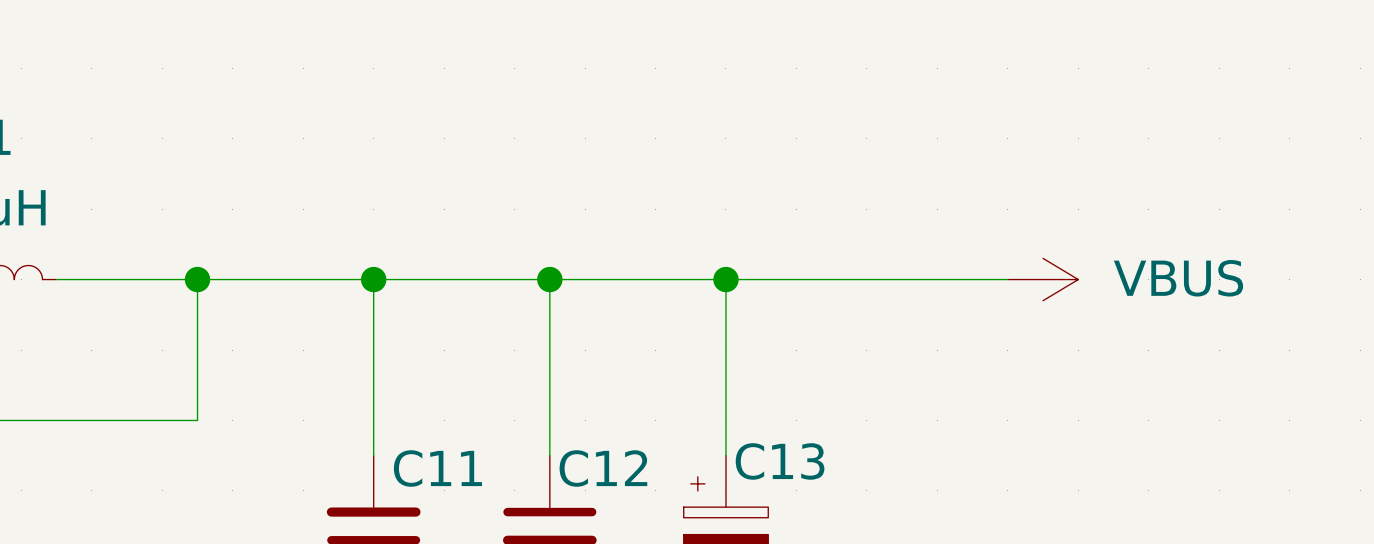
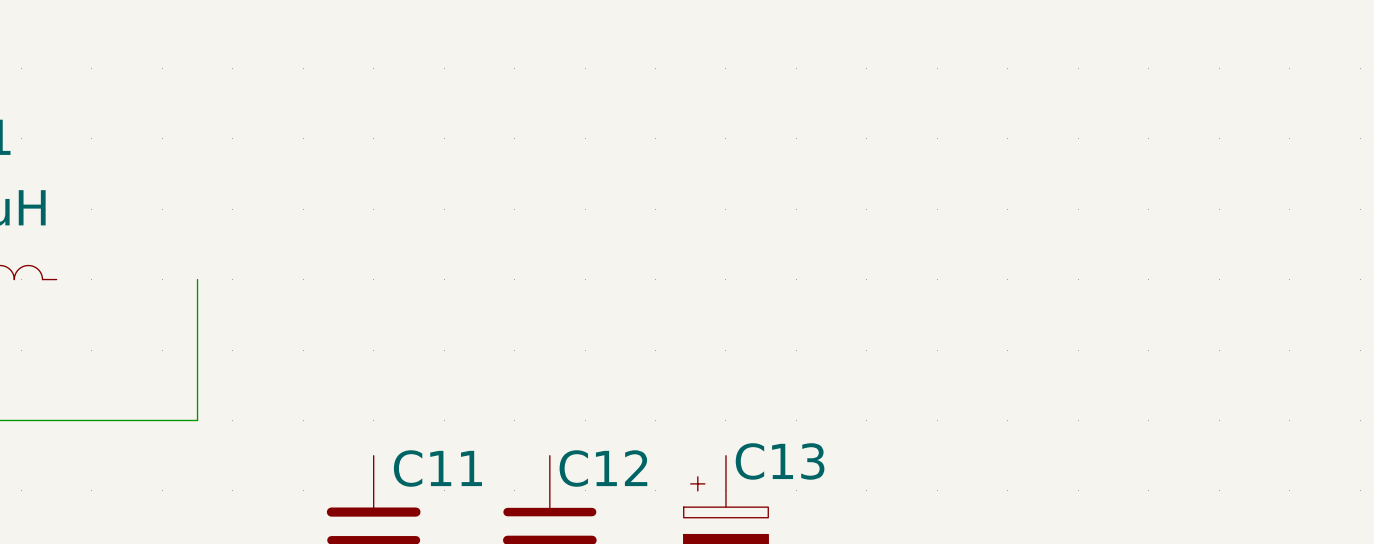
wire: (56, 279) (1007, 279) -> none
junction: (197, 279) -> none
wire: (373, 279) (373, 455) -> none
junction: (373, 279) -> none
wire: (549, 279) (549, 455) -> none
junction: (549, 279) -> none
wire: (725, 279) (725, 455) -> none
junction: (725, 279) -> none
power symbol: VBUS (1043, 279) -> none

